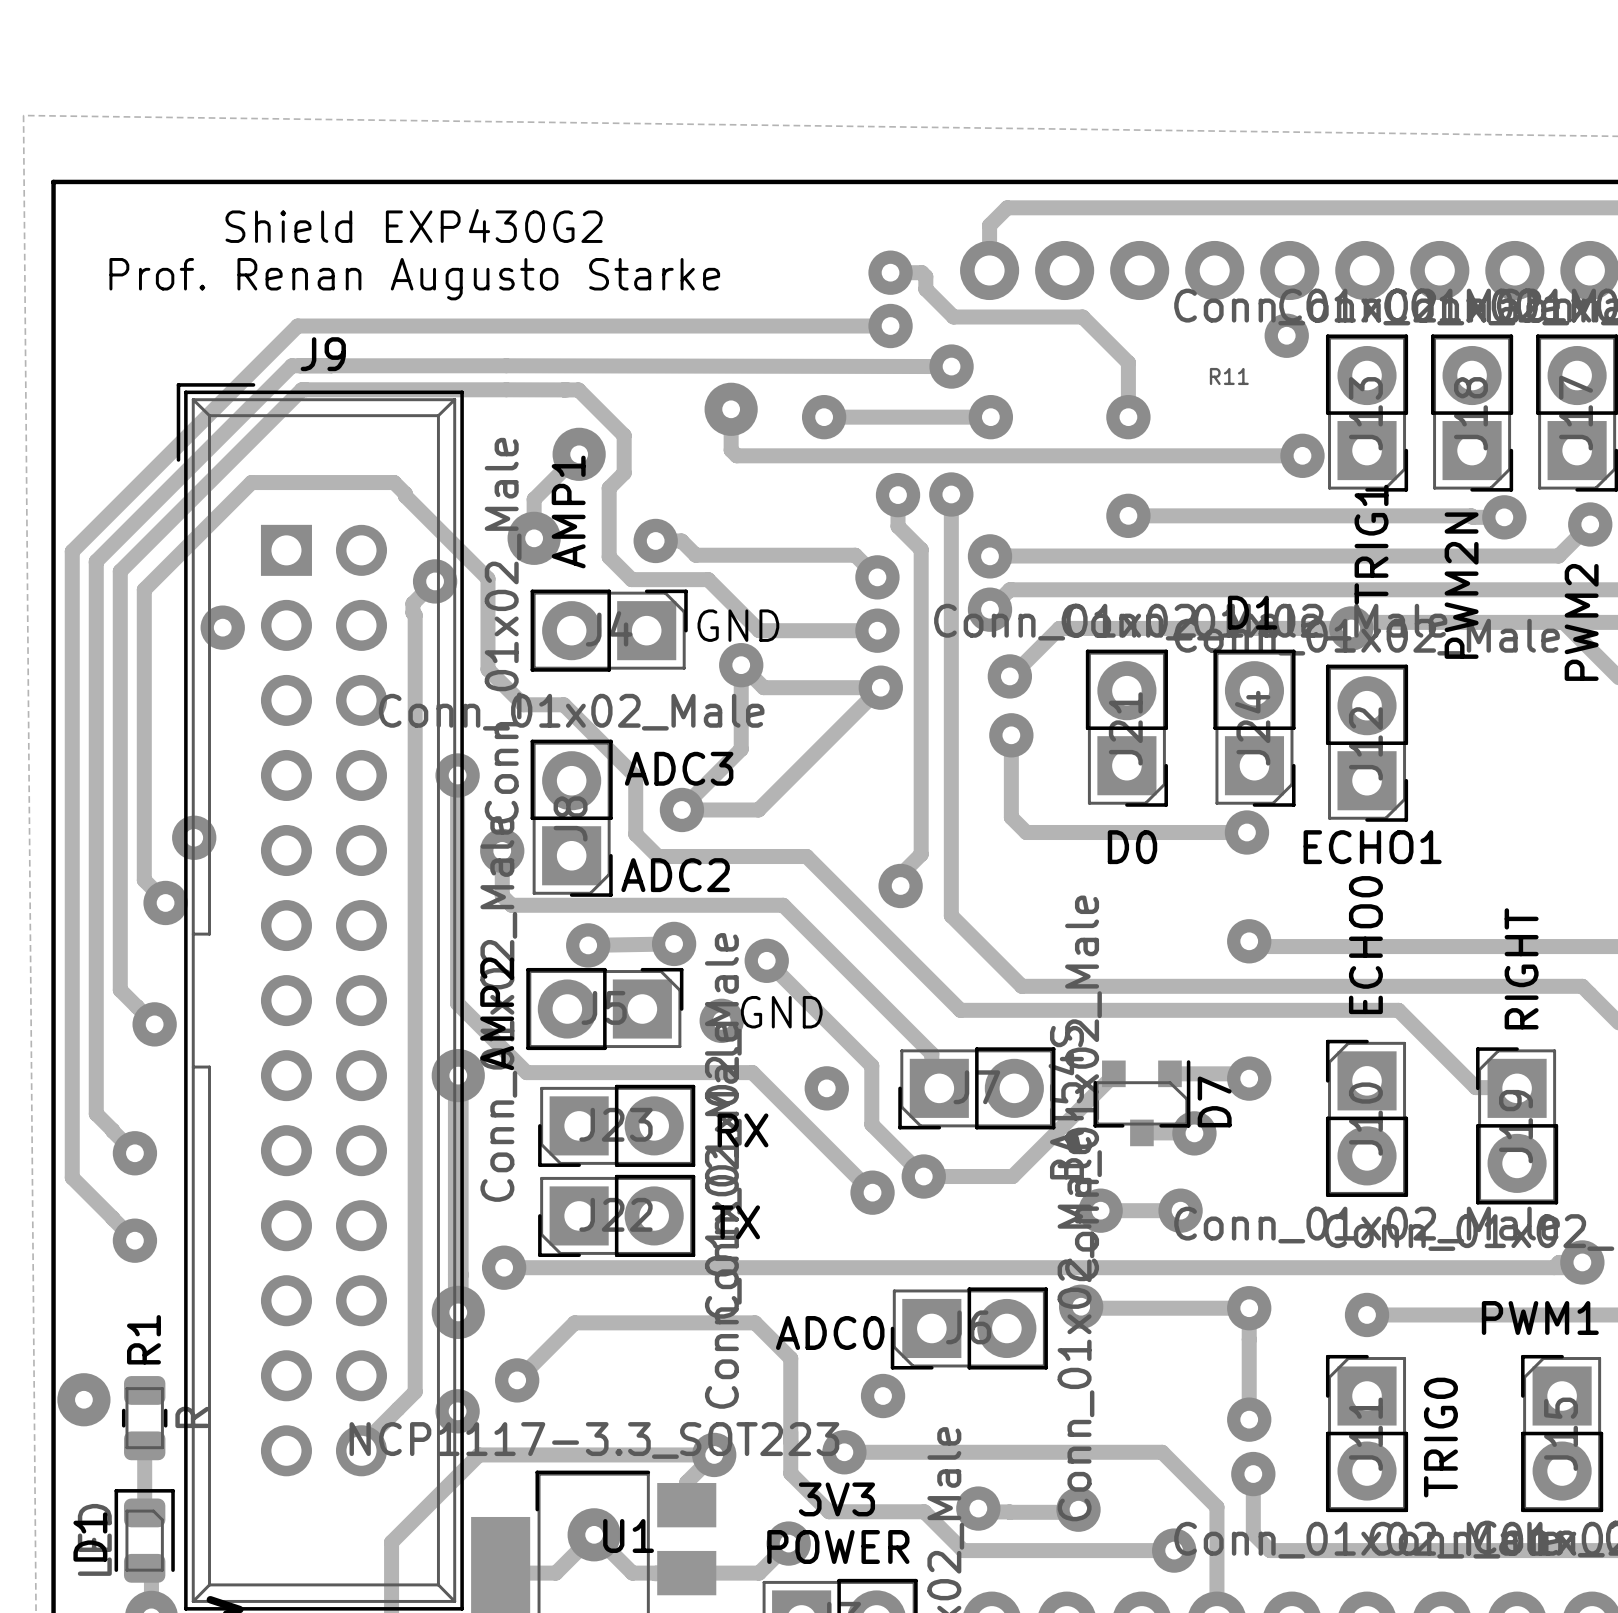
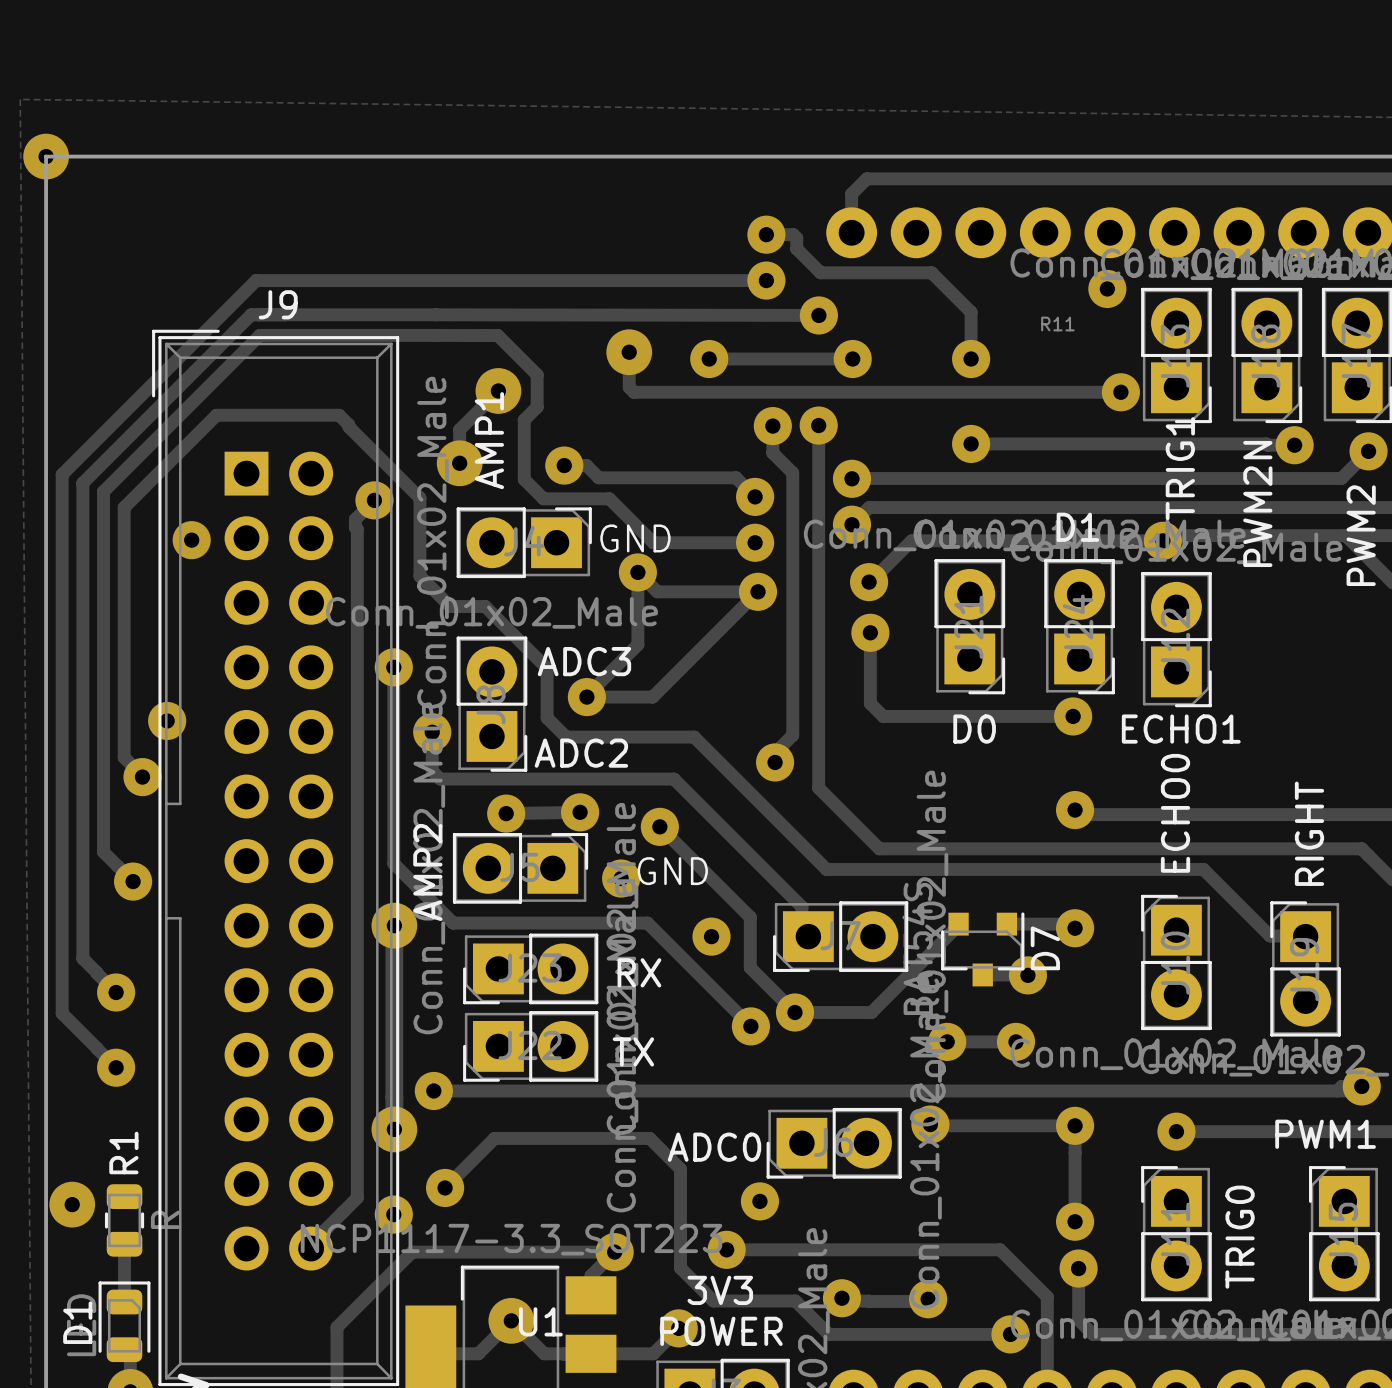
via: none -> (46, 156)
text: Shield EXP430G2 (414, 225) -> none
text: Prof. Renan Augusto Starke (414, 279) -> none

